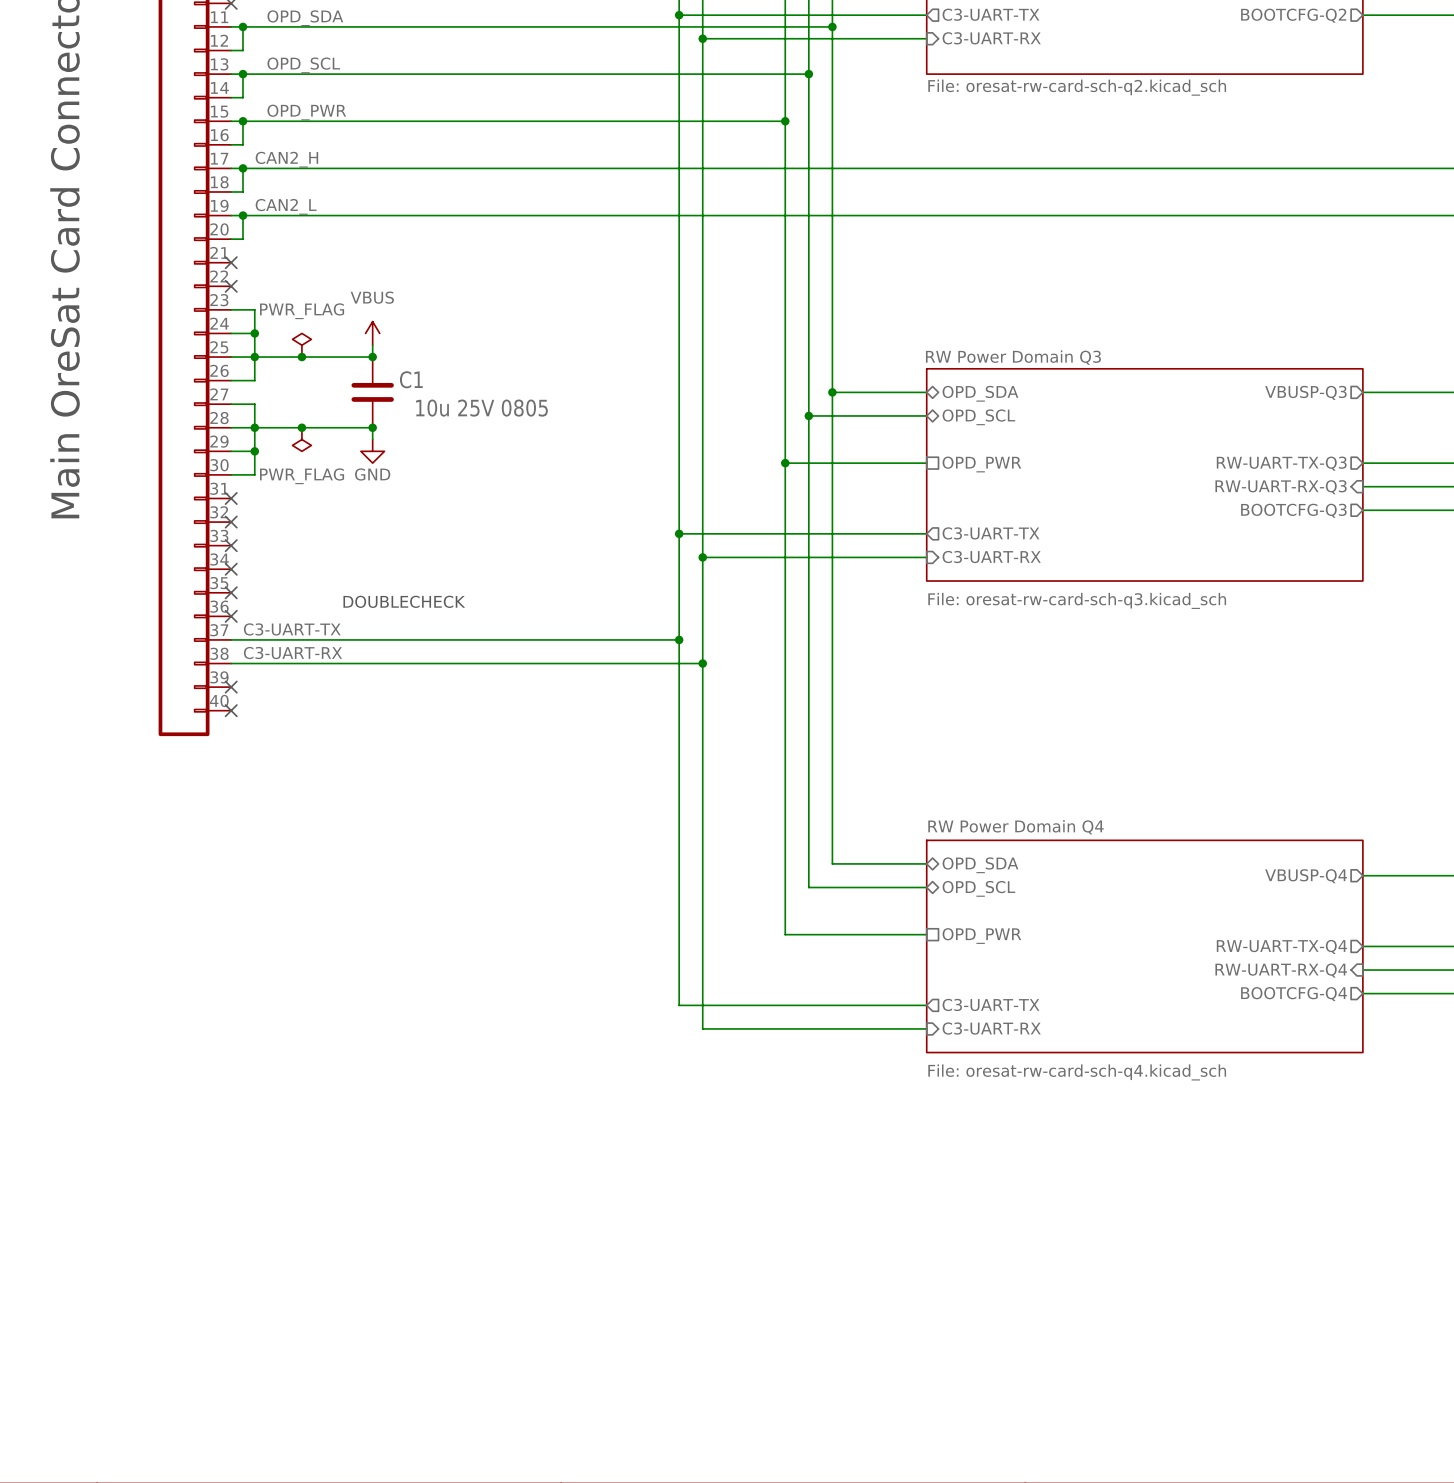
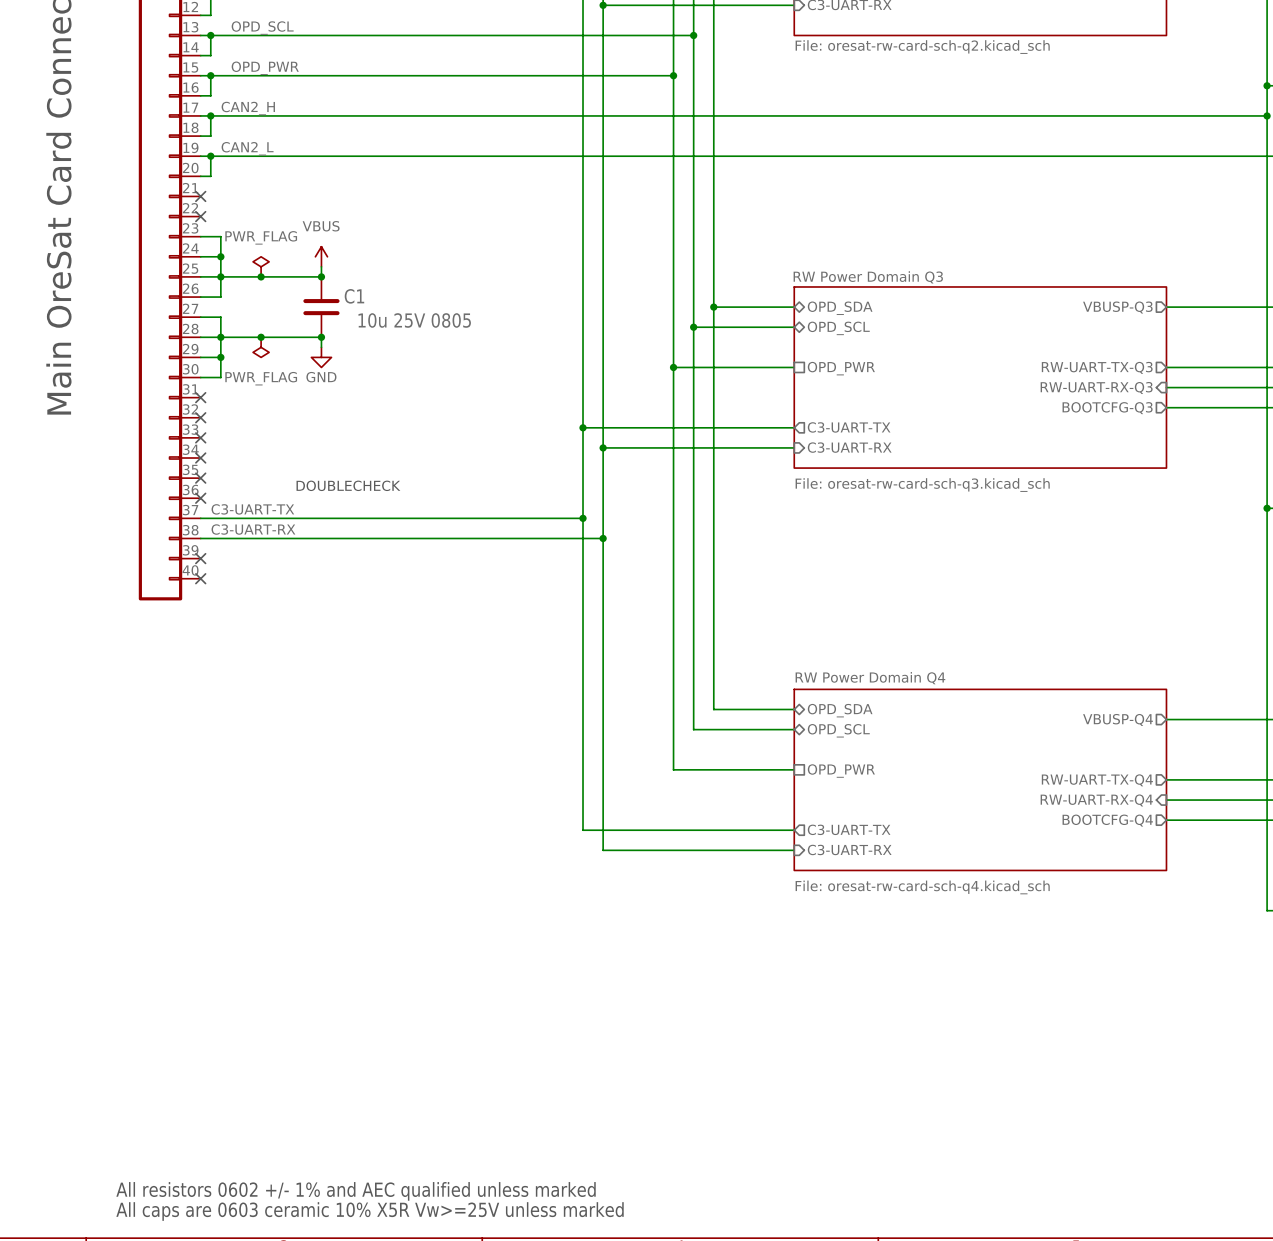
text: none -> All resistors 0602 +/- 1% and AEC qualified unless marked (356, 1191)
text: none -> All caps are 0603 ceramic 10% X5R Vw>=25V unless marked (370, 1211)

